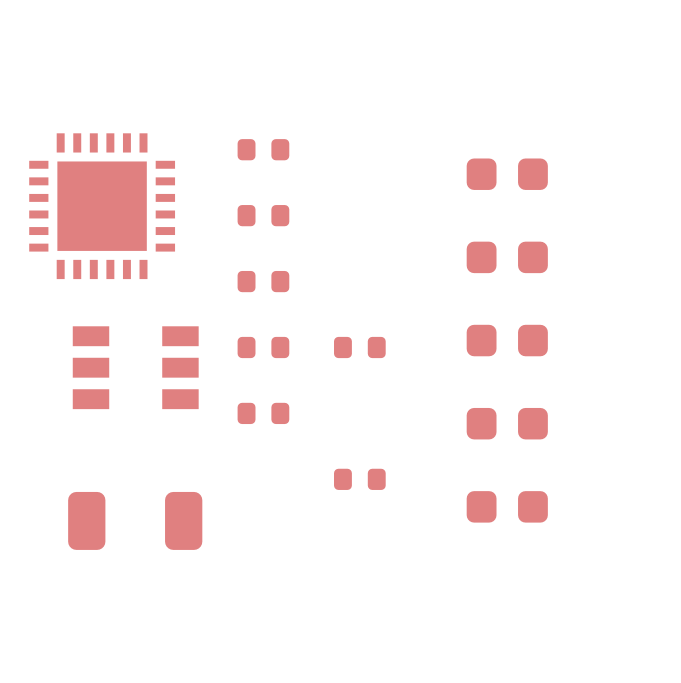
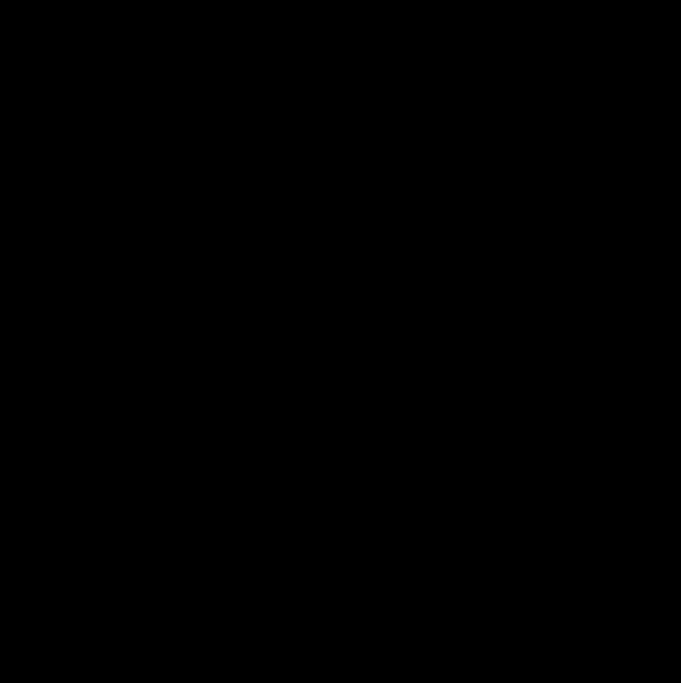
part: (263, 149) -> none
part: (507, 174) -> none
part: (102, 206) -> none
part: (263, 215) -> none
part: (507, 257) -> none
part: (263, 281) -> none
part: (507, 340) -> none
part: (263, 347) -> none
part: (359, 347) -> none
part: (135, 367) -> none
part: (263, 413) -> none
part: (507, 423) -> none
part: (359, 479) -> none
part: (507, 506) -> none
part: (135, 520) -> none

